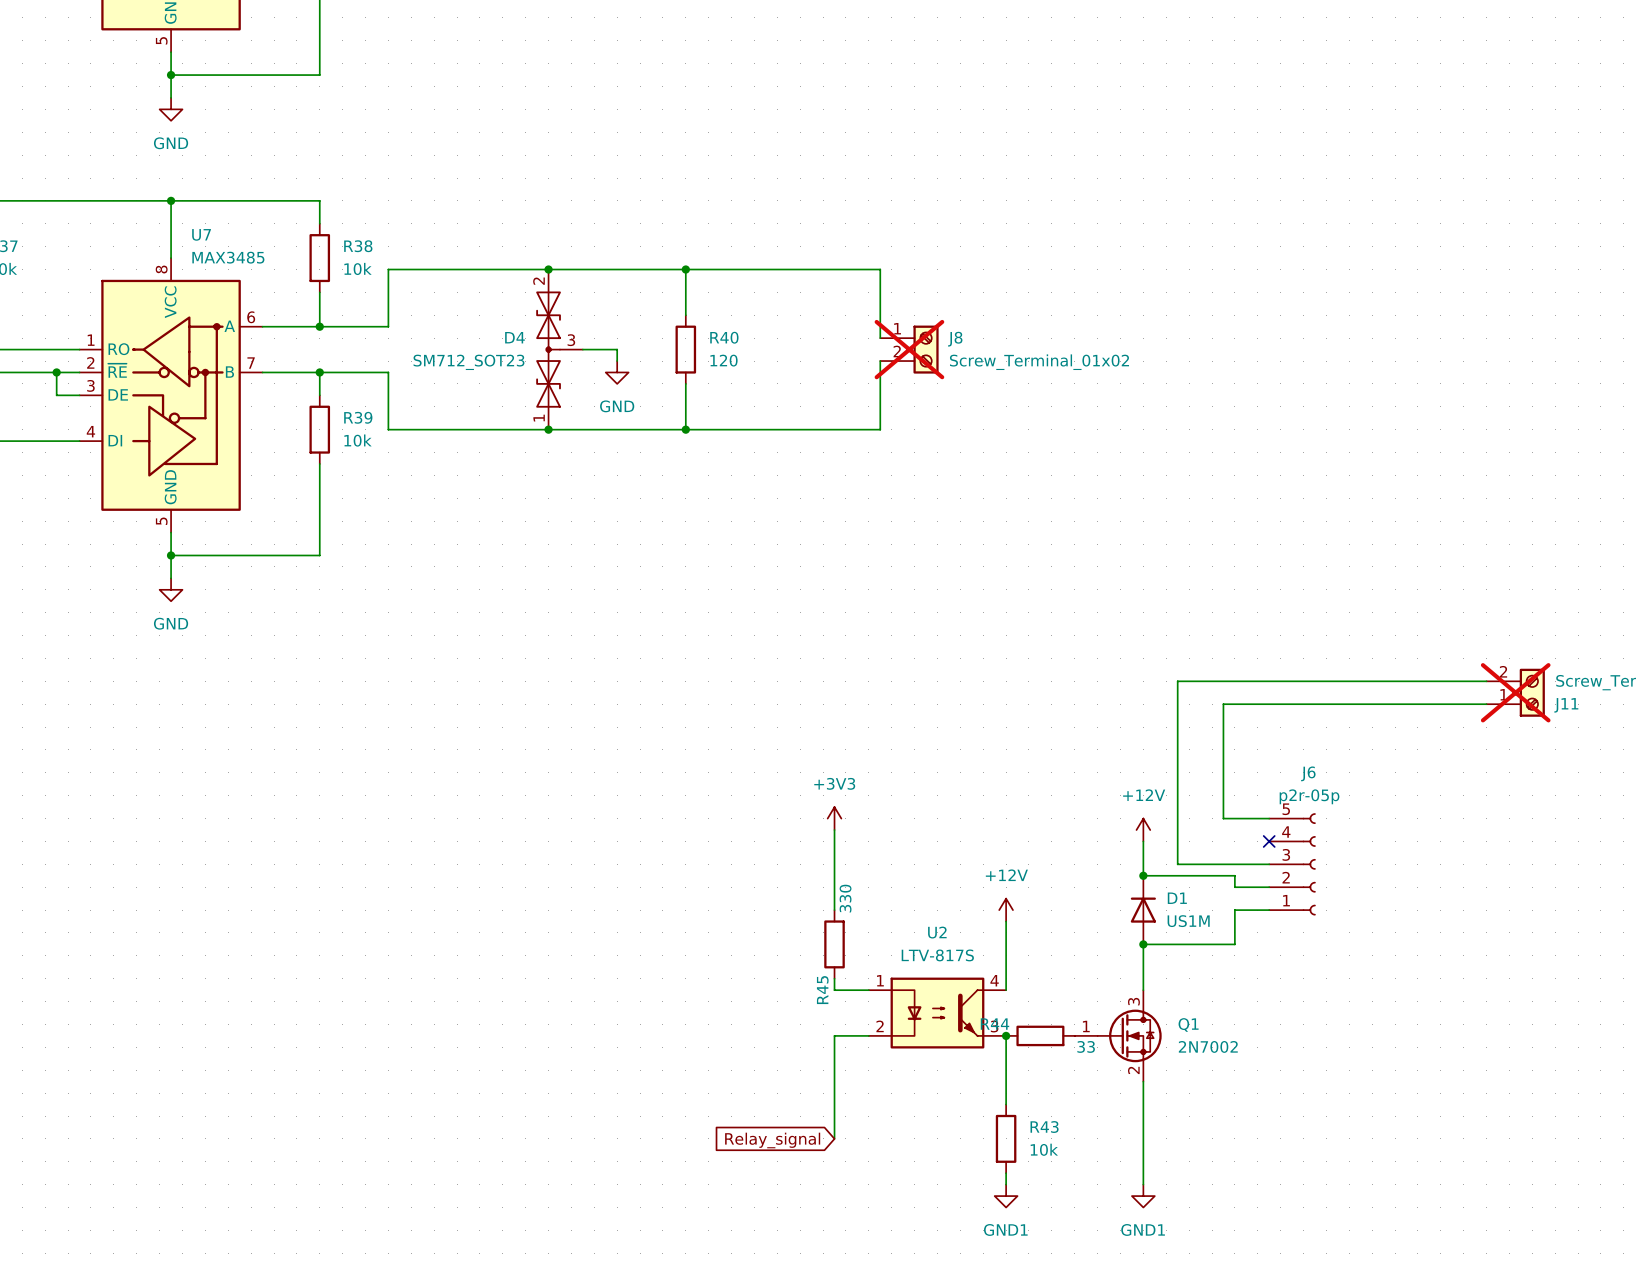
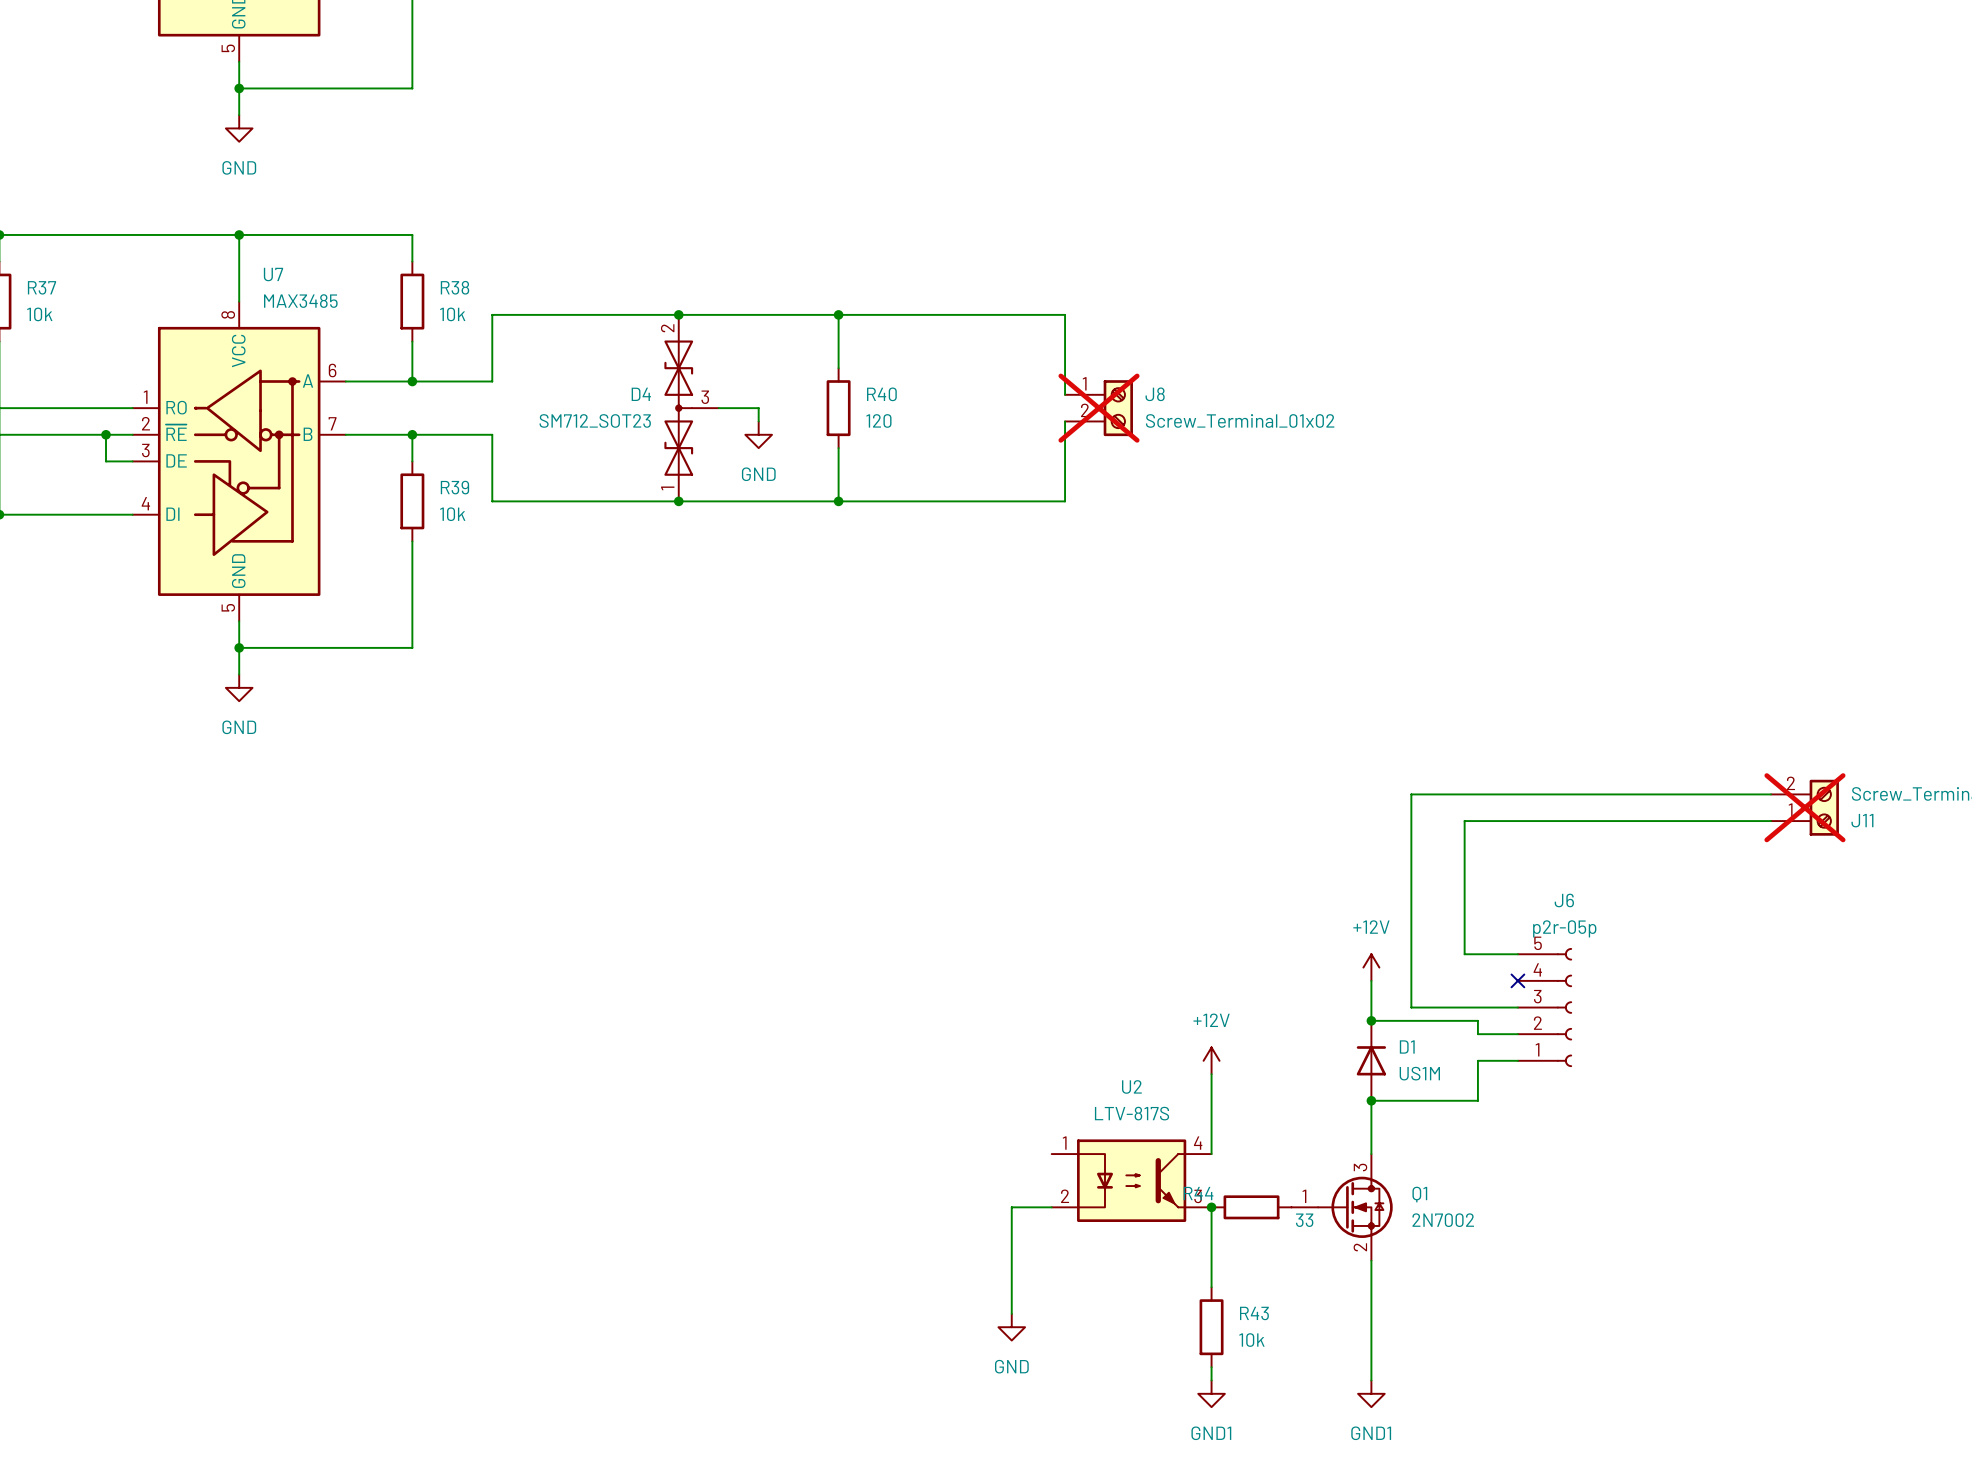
power symbol: +3V3 (834, 818) -> none
wire: (834, 830) (834, 910) -> none
R45: 330 (834, 944) -> none
wire: (834, 978) (834, 990) (868, 990) -> none
power symbol: none -> GND (1011, 1327)
global label: Relay_signal (772, 1140) -> none

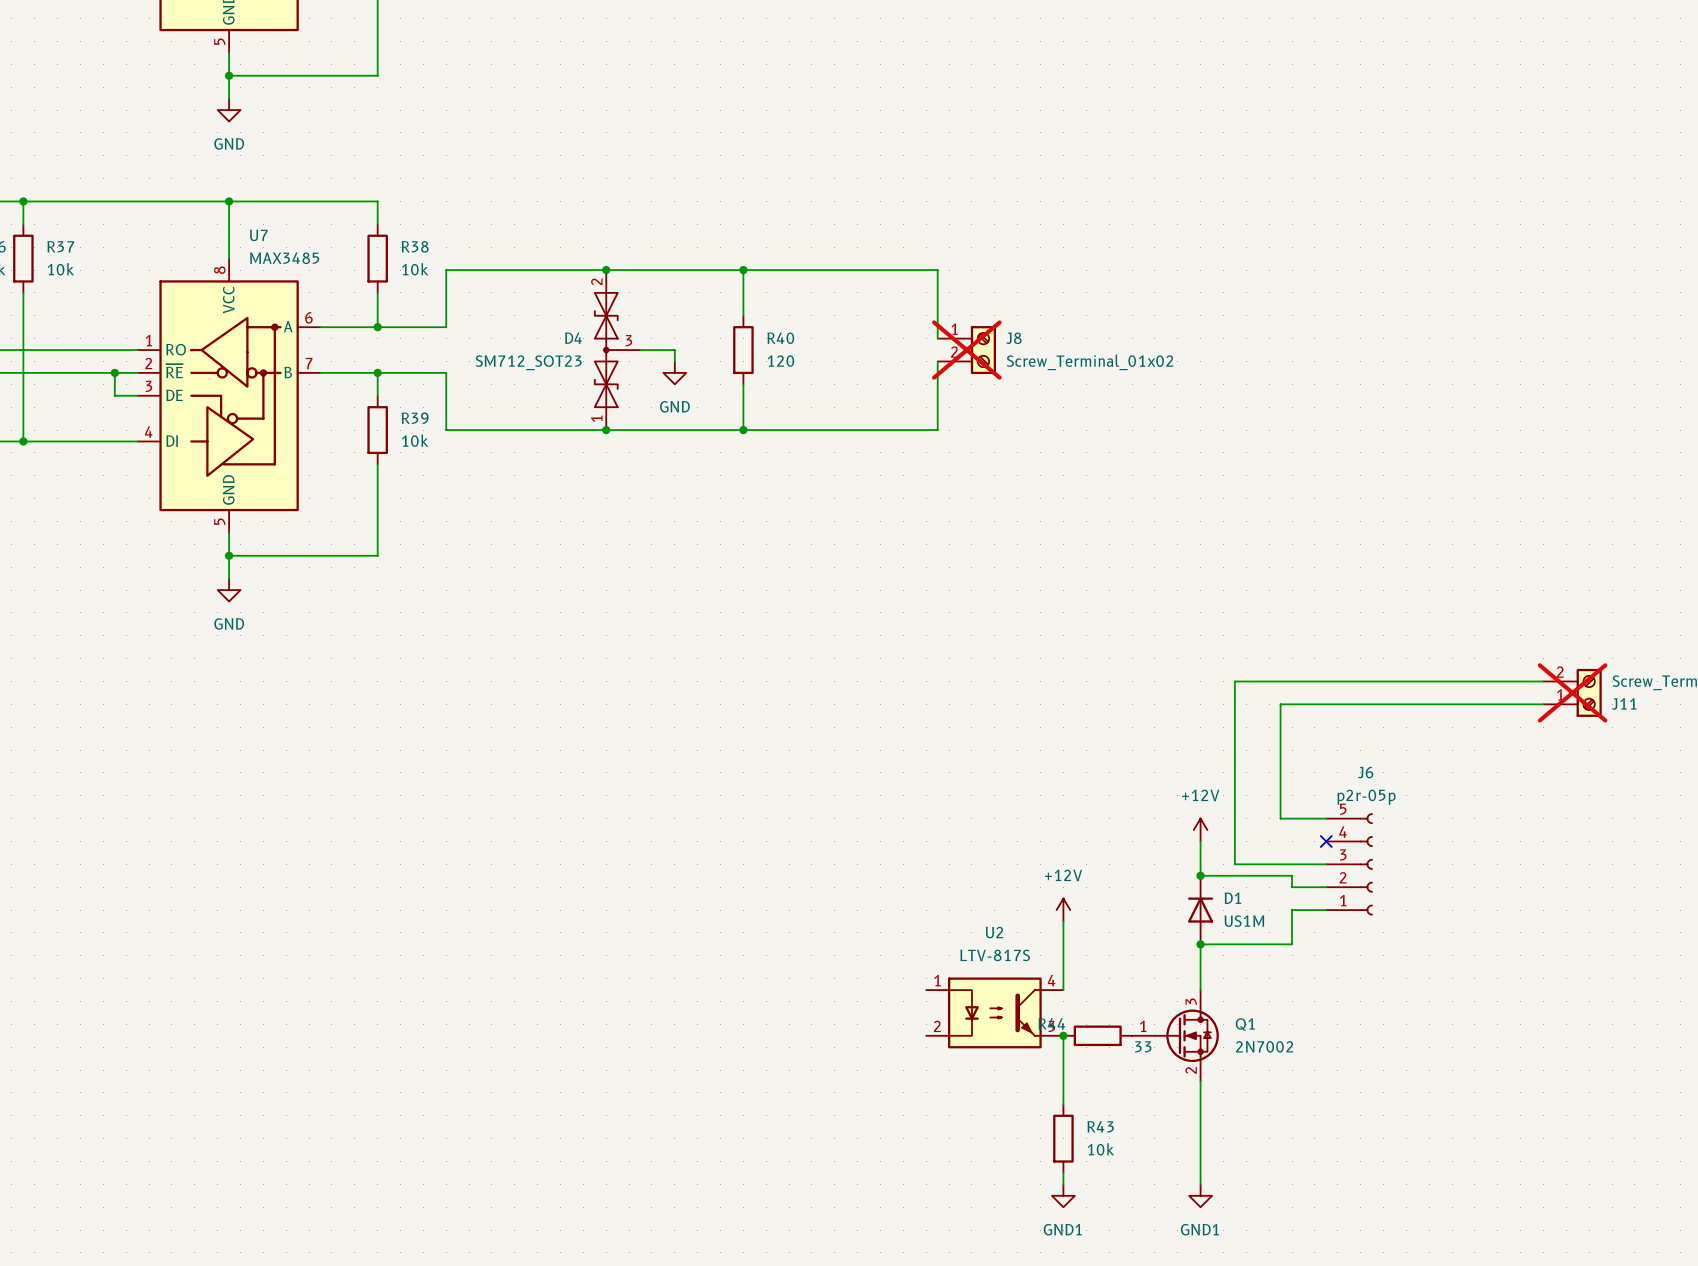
wire: (1051, 1207) (1011, 1207) (1011, 1313) -> none
power symbol: GND (1011, 1327) -> none

